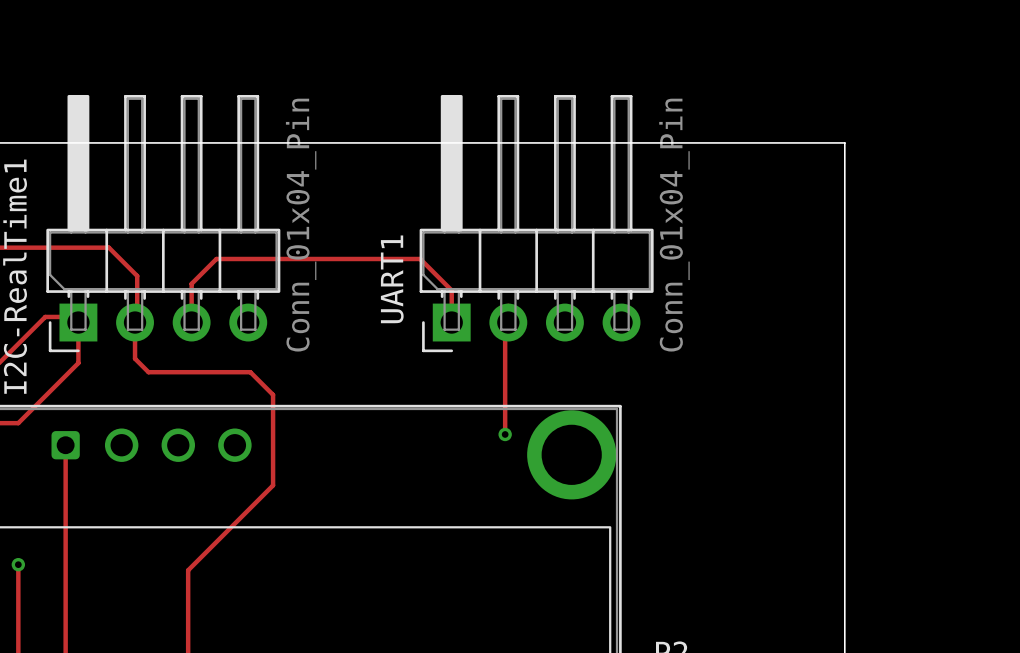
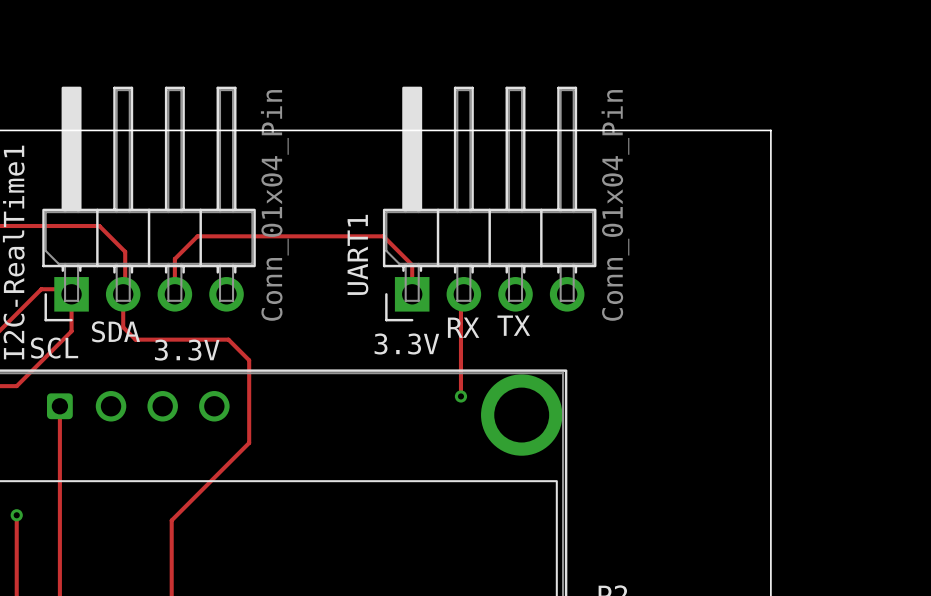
text: none -> TX (513, 325)
text: none -> RX (463, 327)
text: none -> SDA (115, 331)
text: none -> 3.3V (406, 344)
text: none -> SCL (54, 348)
text: none -> 3.3V (187, 350)

